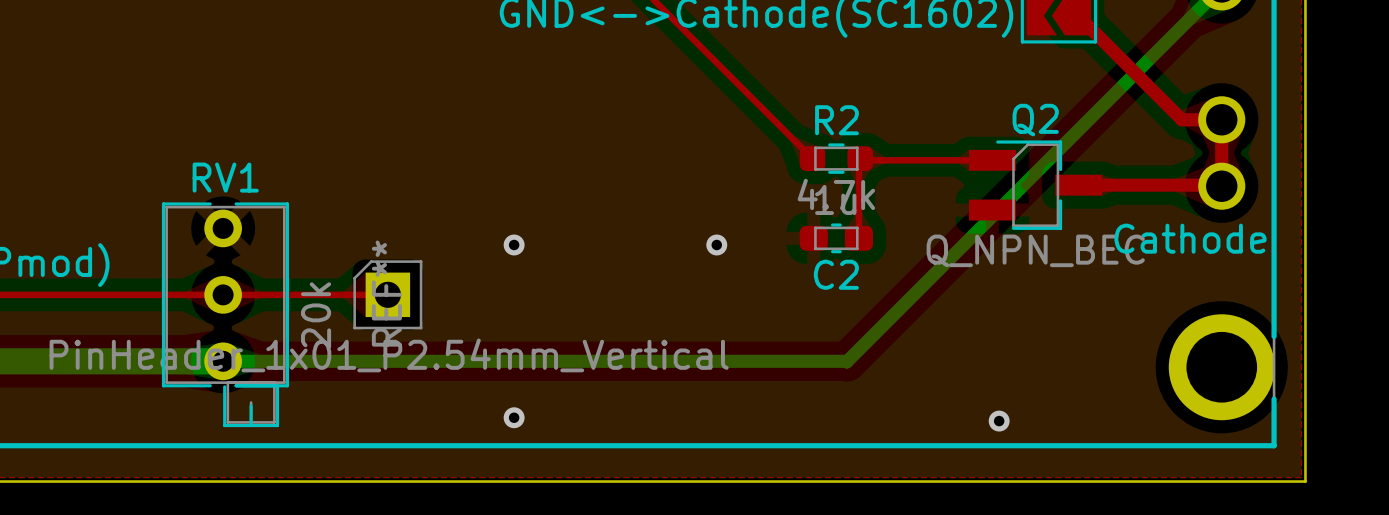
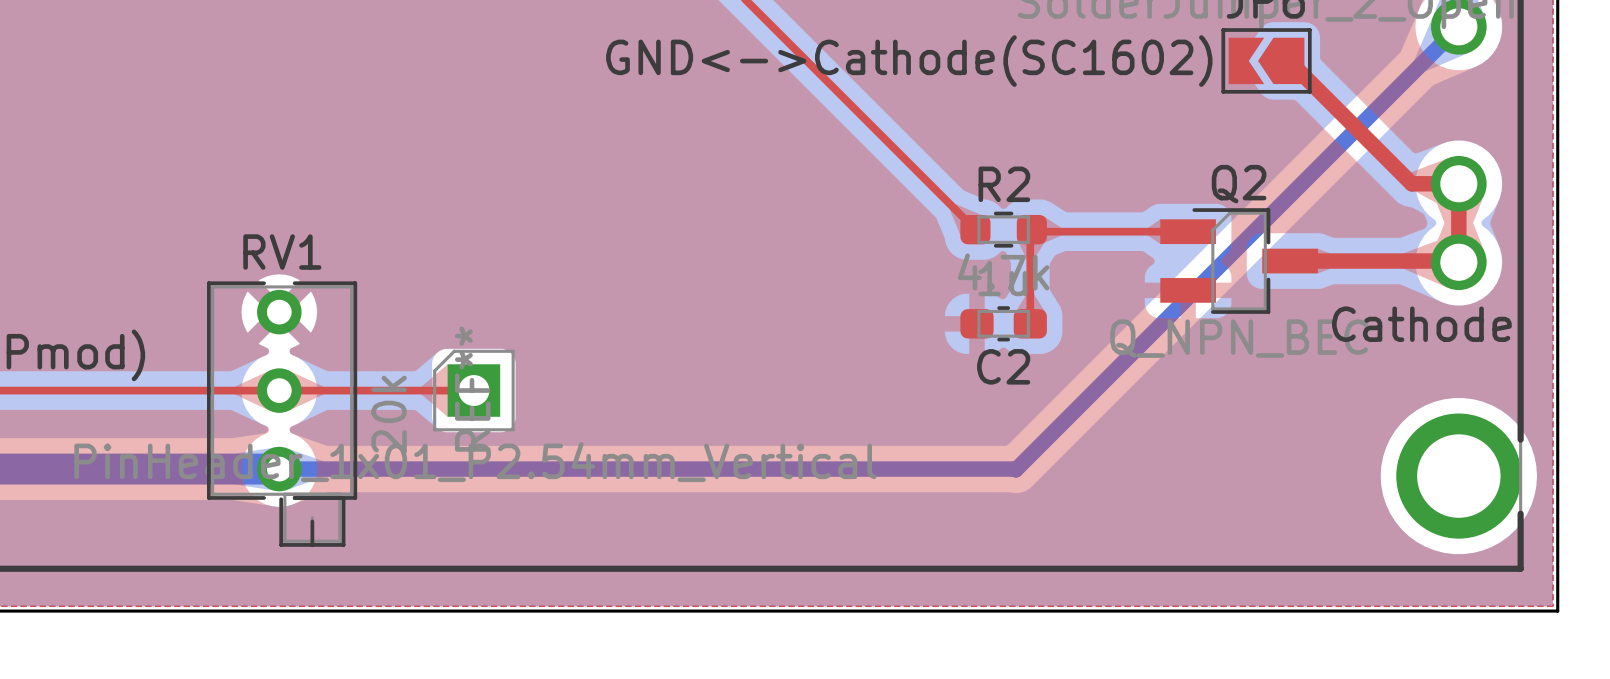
via: (514, 244) -> none
via: (716, 244) -> none
via: (514, 417) -> none
via: (999, 421) -> none

